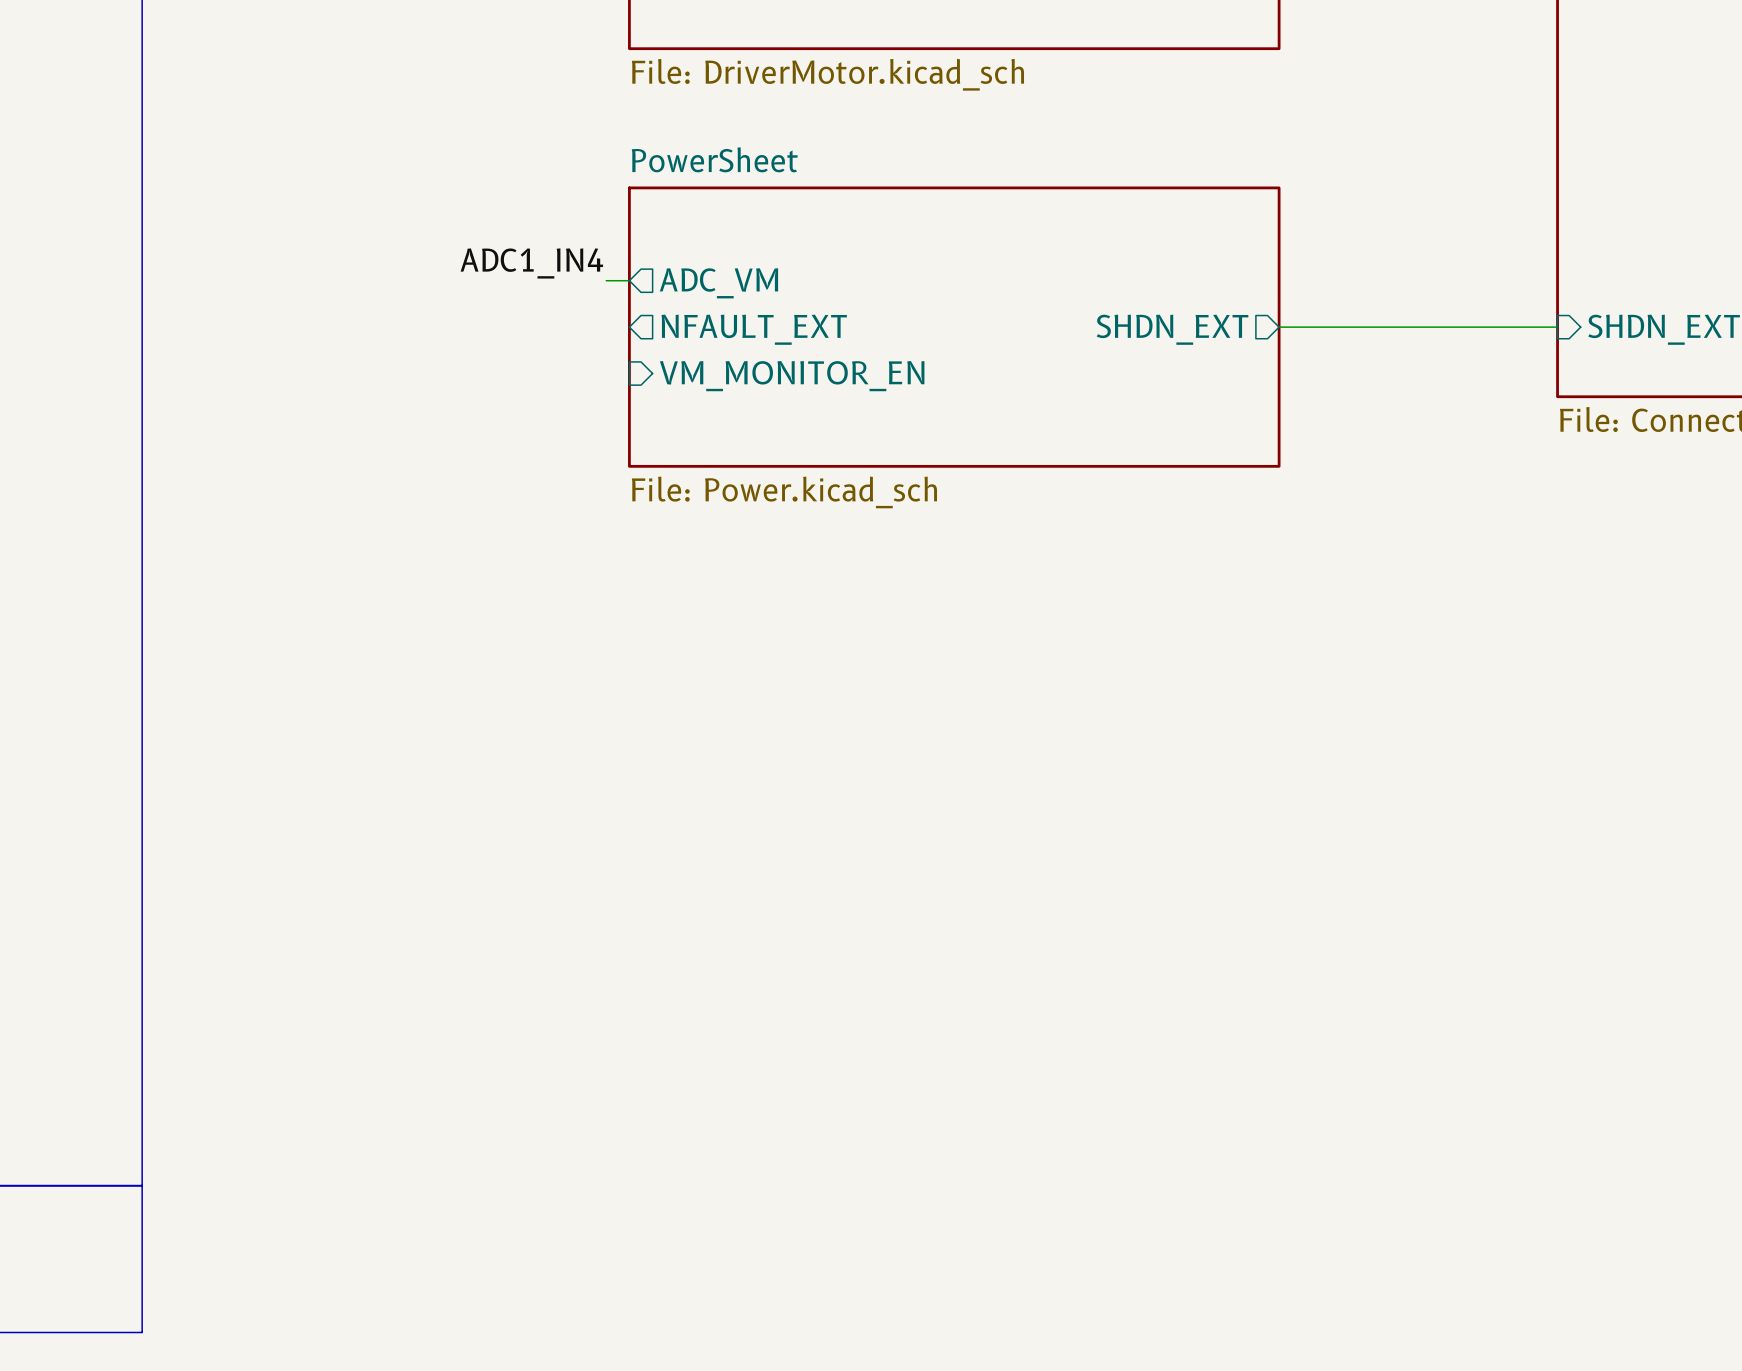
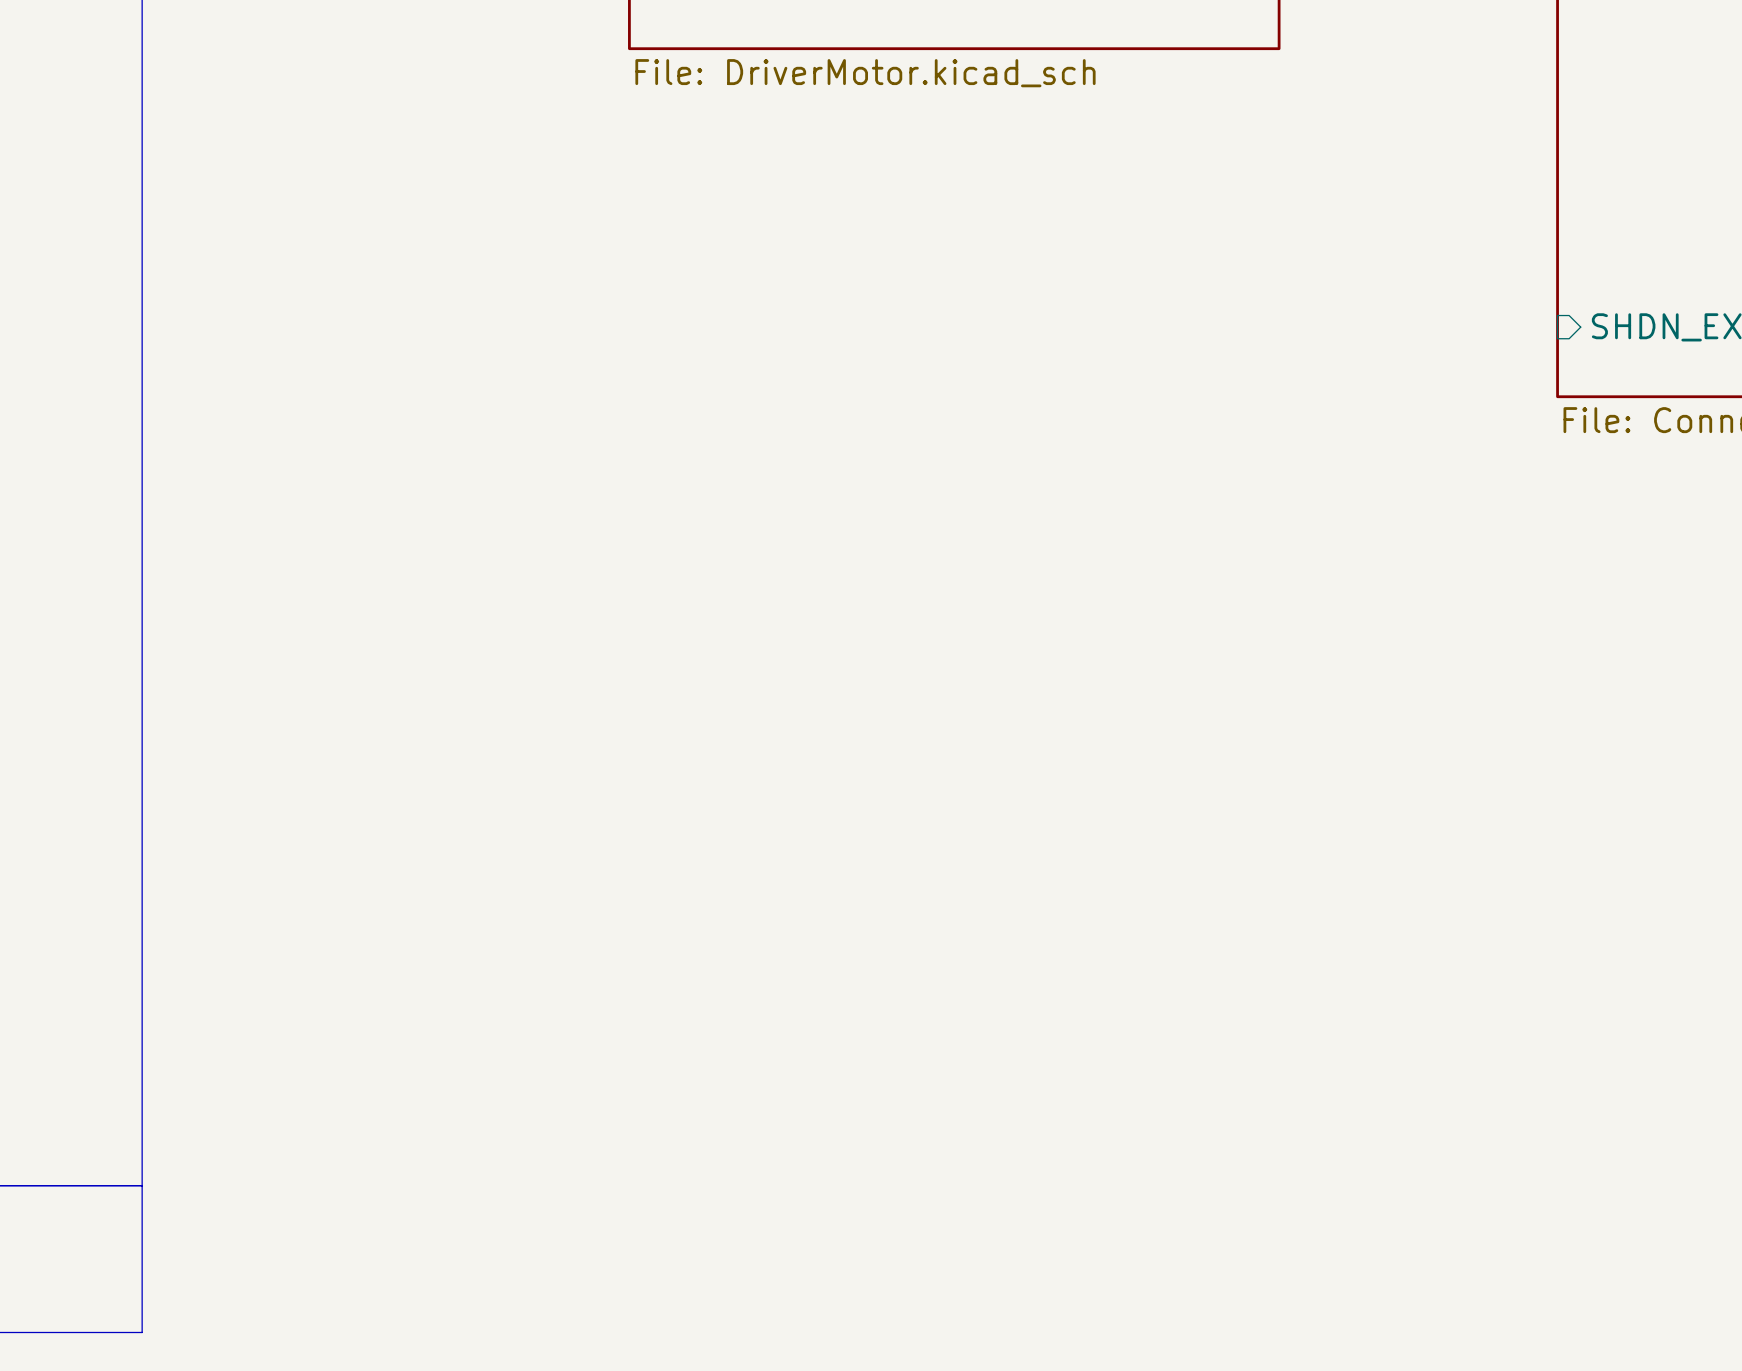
label: ADC1_IN4 (531, 263) -> none
wire: (606, 280) (629, 280) -> none
sheet pin: ADC_VM (718, 283) -> none
sheet PowerSheet: File: Power.kicad_sch (954, 327) -> none
wire: (1279, 327) (1557, 327) -> none
sheet pin: NFAULT_EXT (754, 329) -> none
sheet pin: SHDN_EXT (1172, 329) -> none
sheet pin: VM_MONITOR_EN (792, 376) -> none

